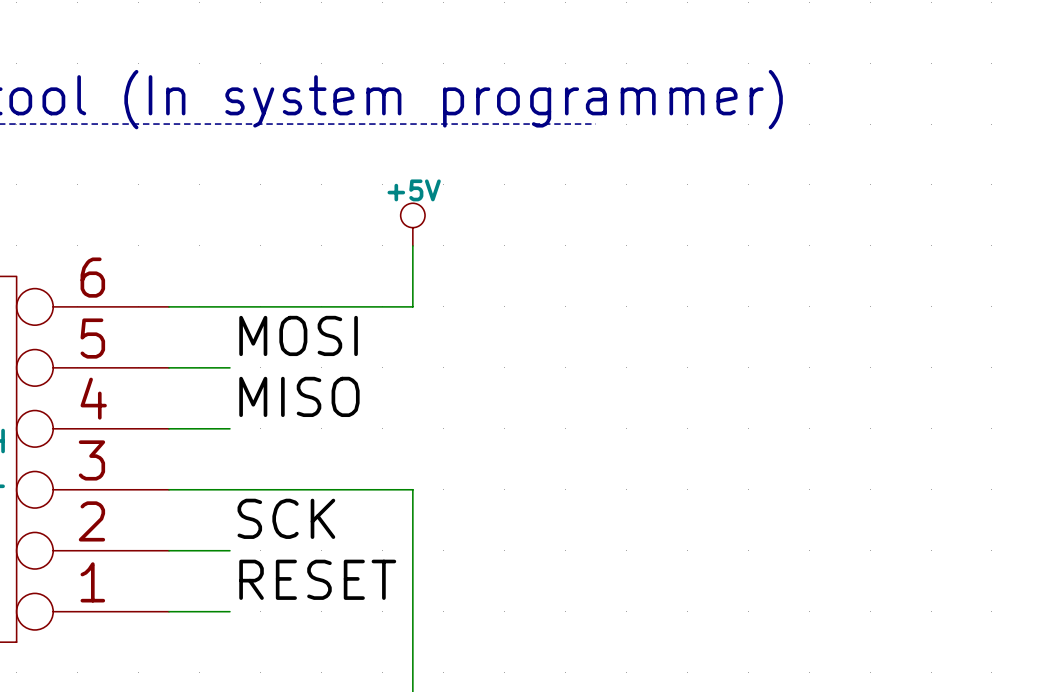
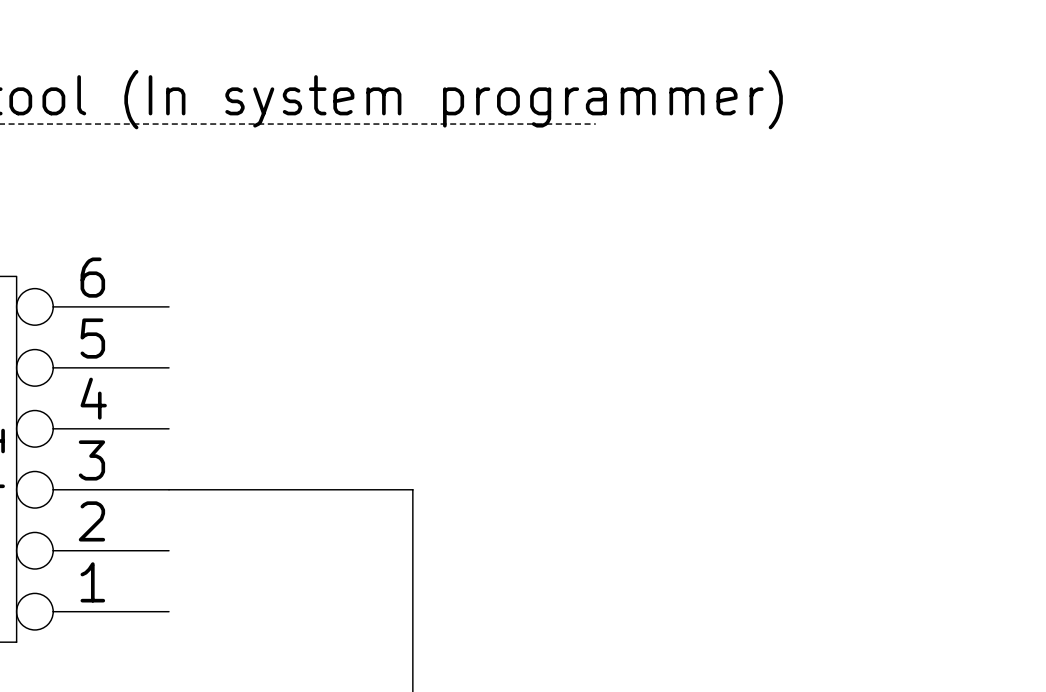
power symbol: +5V (412, 224) -> none
wire: (412, 245) (412, 306) (169, 306) -> none
label: MOSI (298, 335) -> none
wire: (169, 367) (229, 367) -> none
label: MISO (299, 396) -> none
wire: (169, 428) (229, 428) -> none
label: SCK (286, 518) -> none
wire: (169, 550) (229, 550) -> none
label: RESET (317, 579) -> none
wire: (169, 611) (229, 611) -> none

